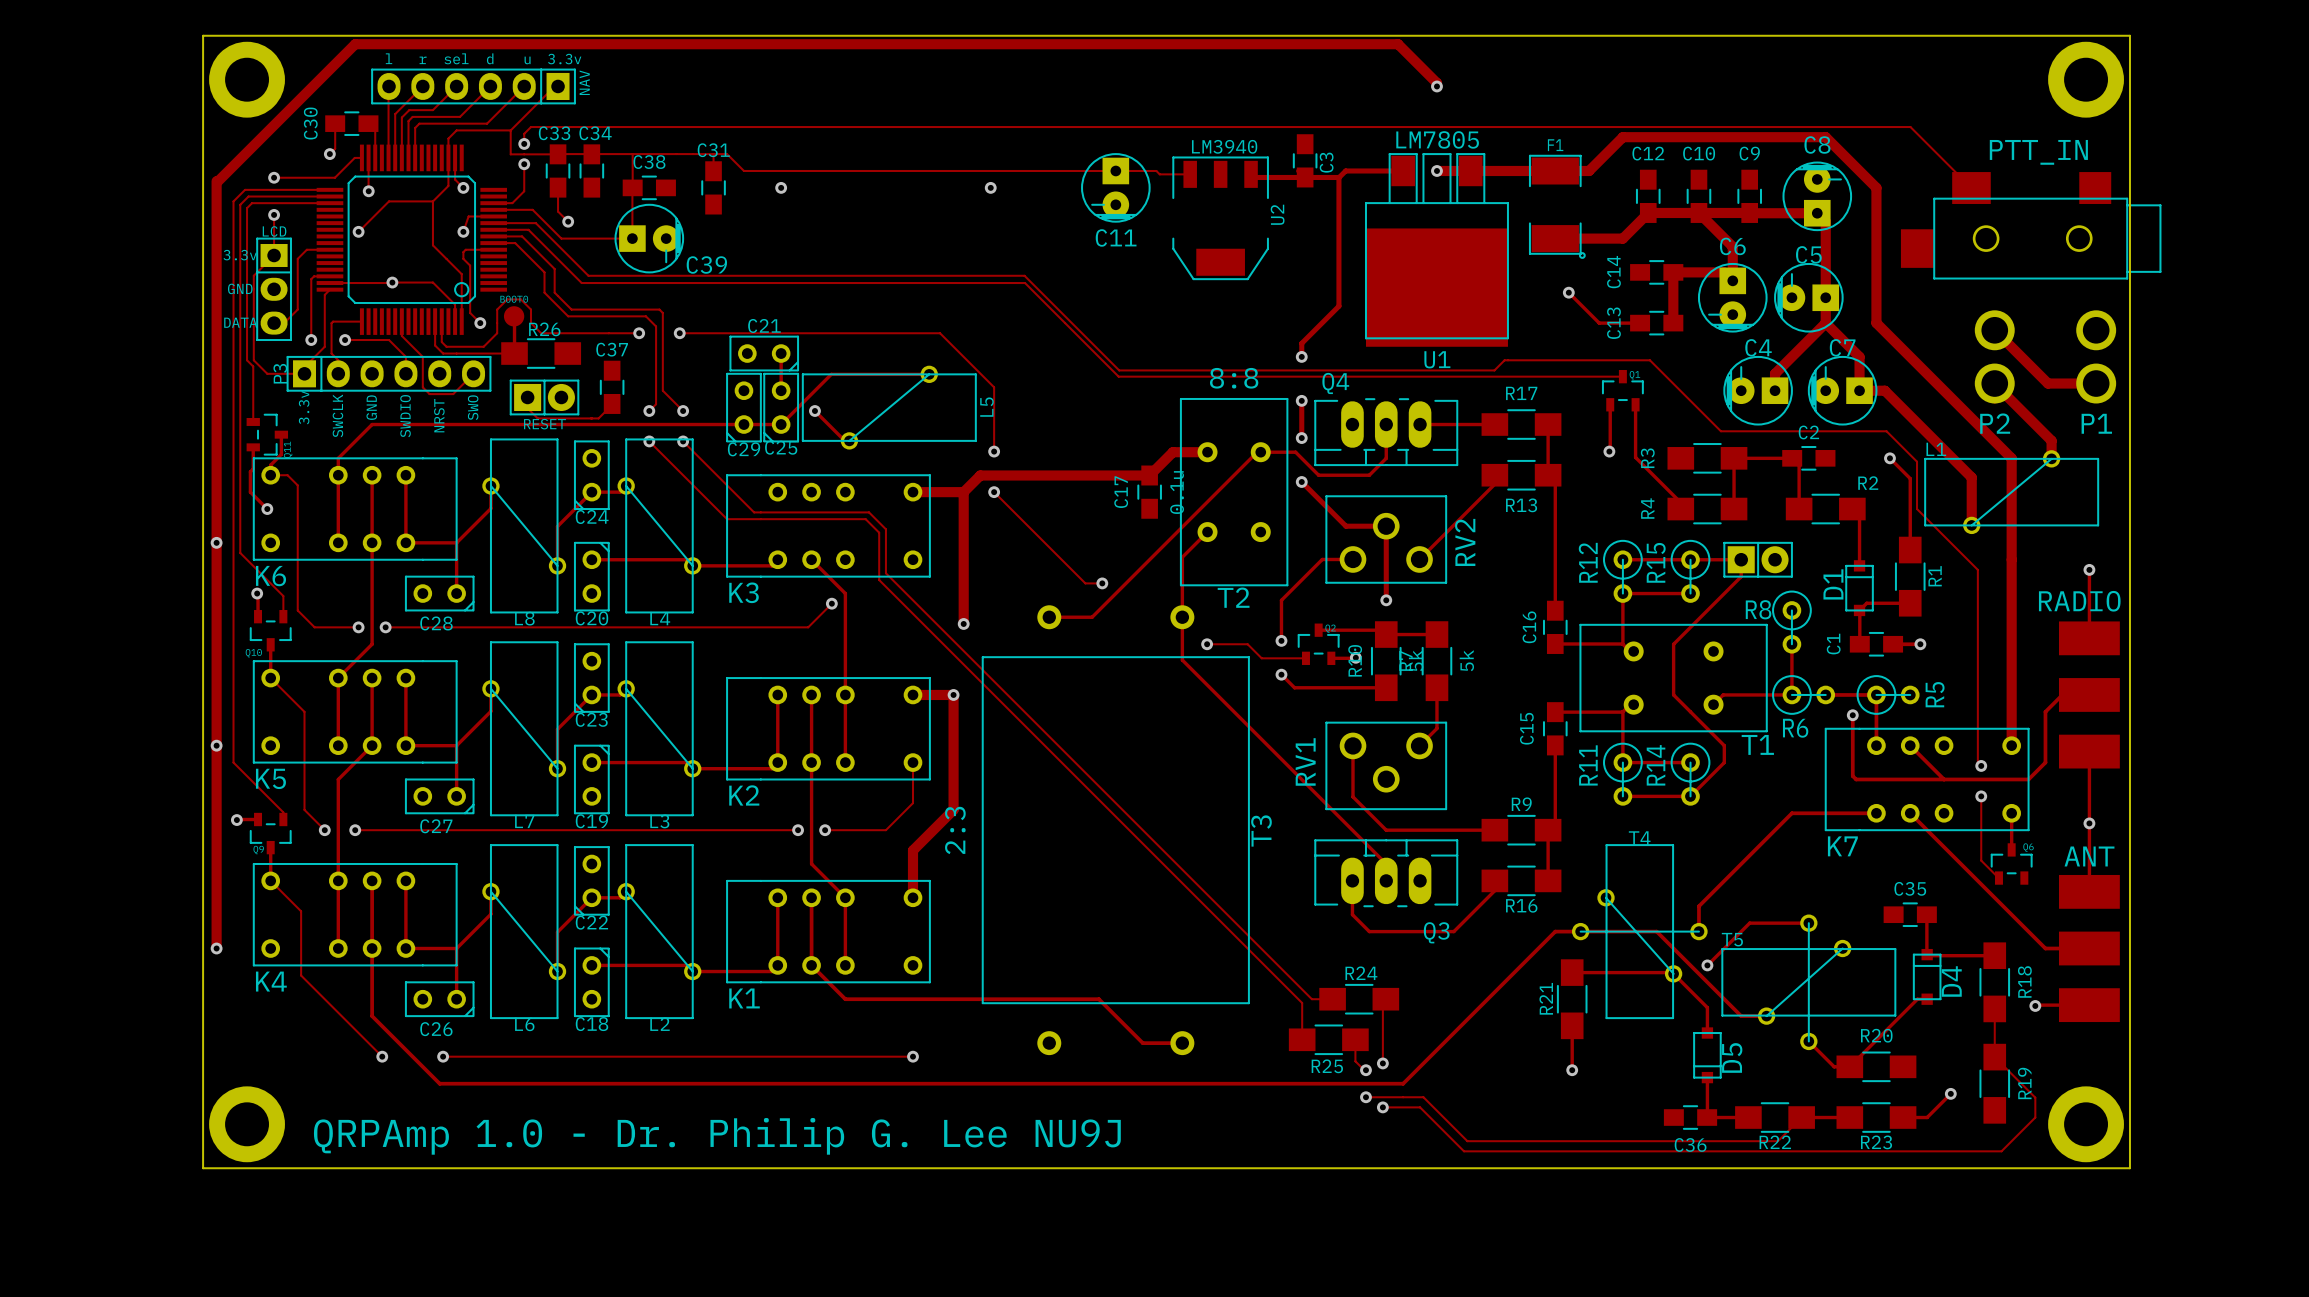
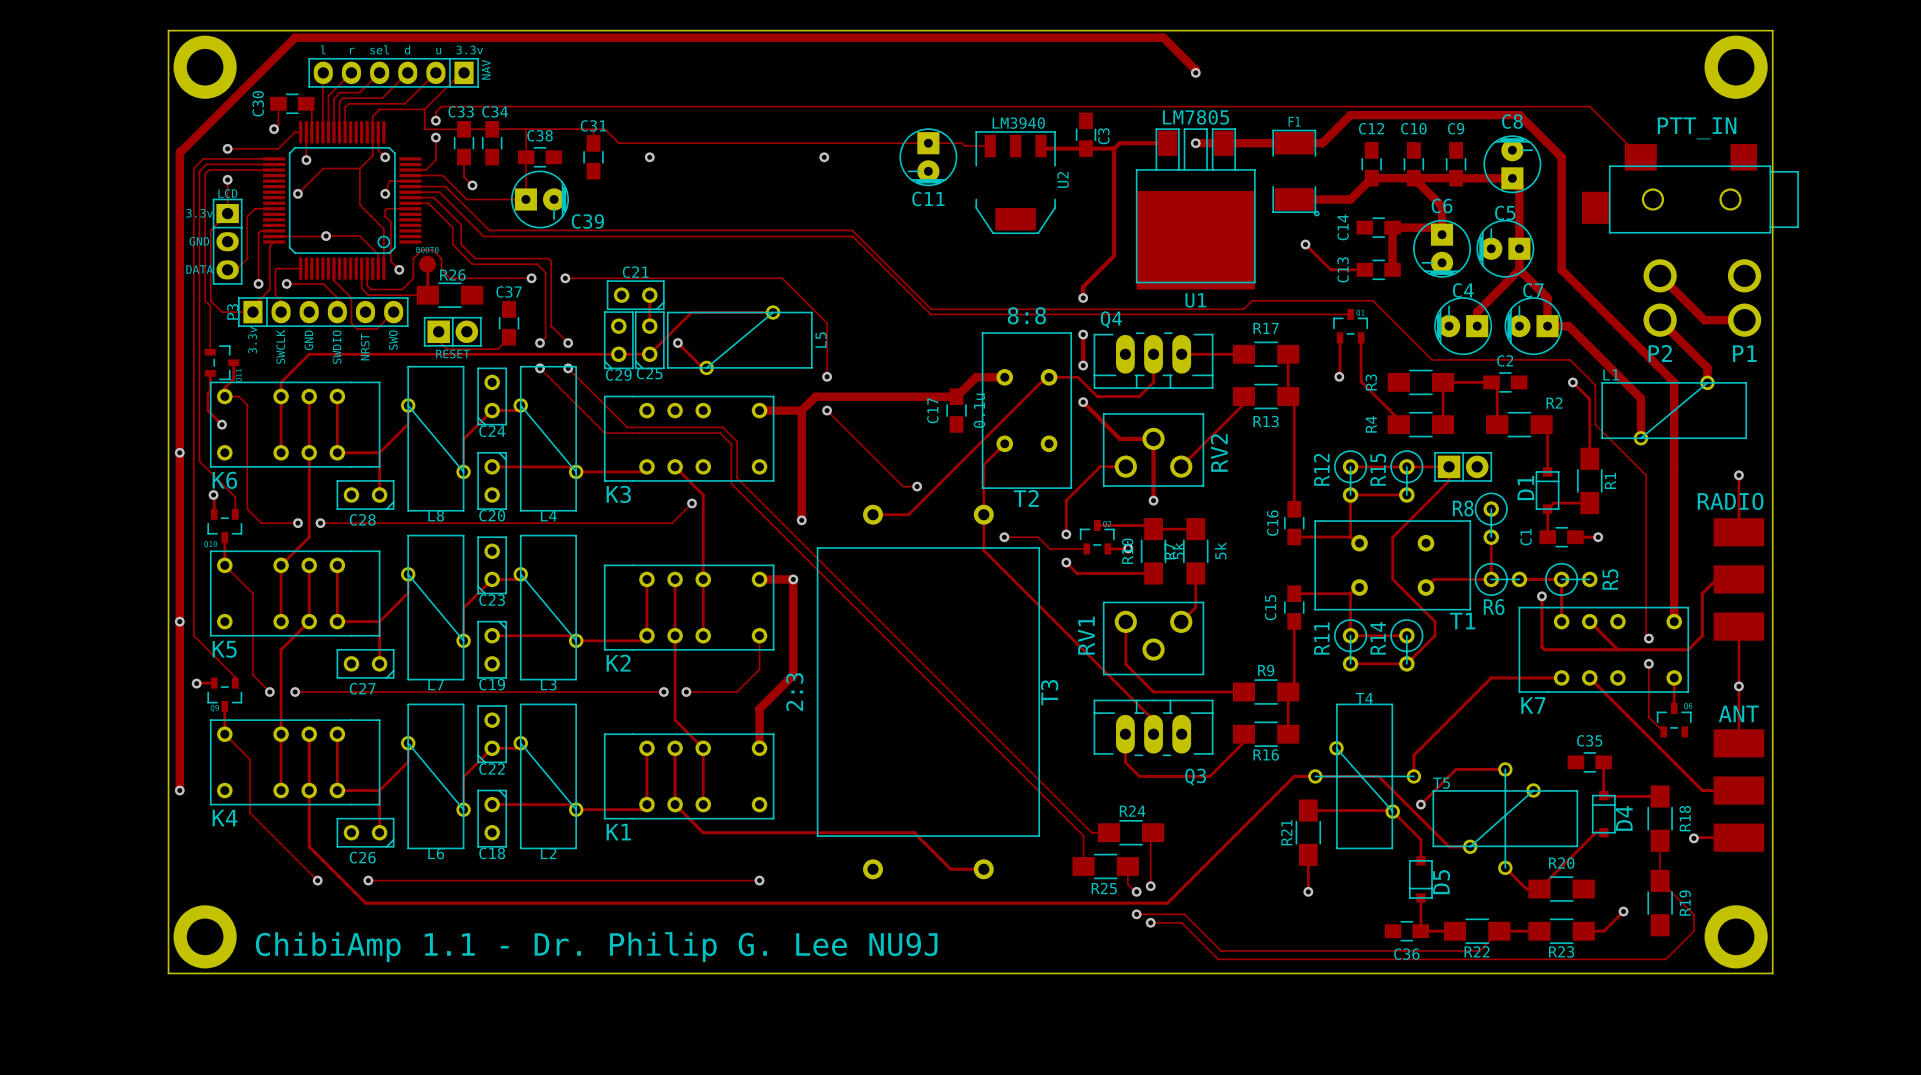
text: QRPAmp 1.0 - Dr. Philip G. Lee NU9J (717, 1136) -> ChibiAmp 1.1 - Dr. Philip G. Lee NU9J (596, 947)

